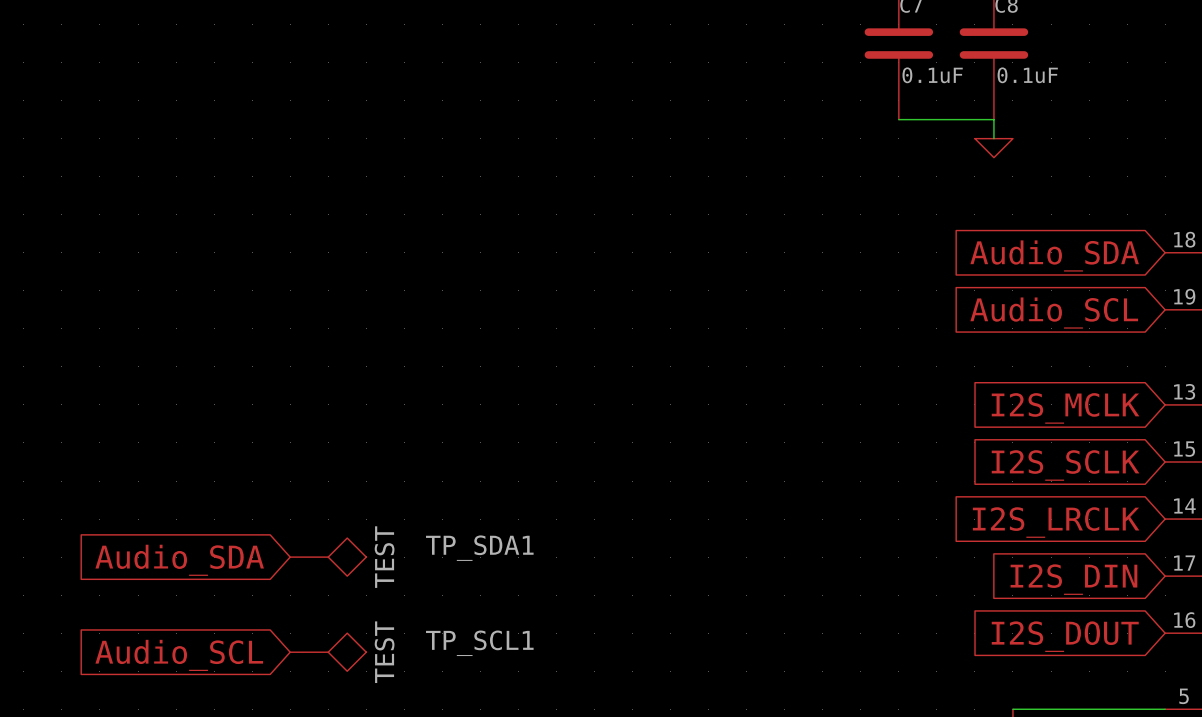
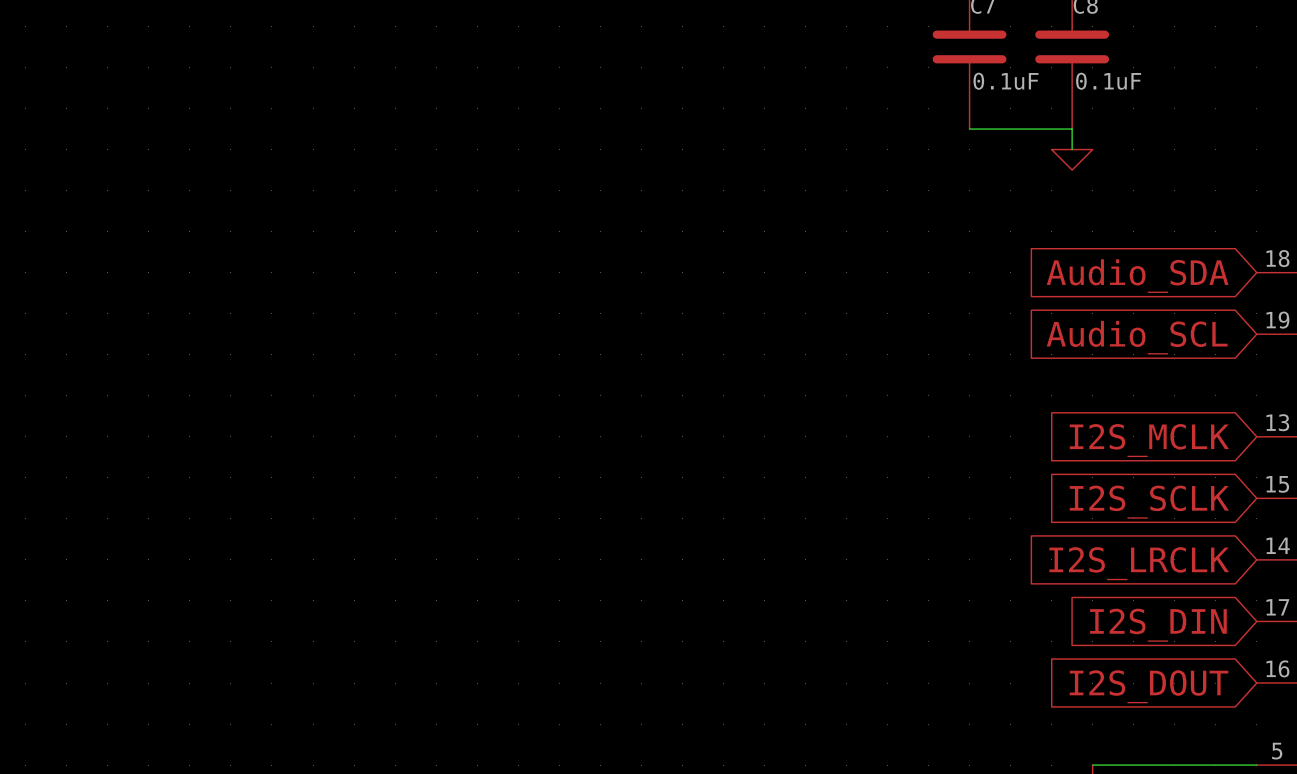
TP_SDA1: TEST (328, 557) -> none
global label: Audio_SDA (179, 560) -> none
TP_SCL1: TEST (328, 652) -> none
global label: Audio_SCL (179, 655) -> none

